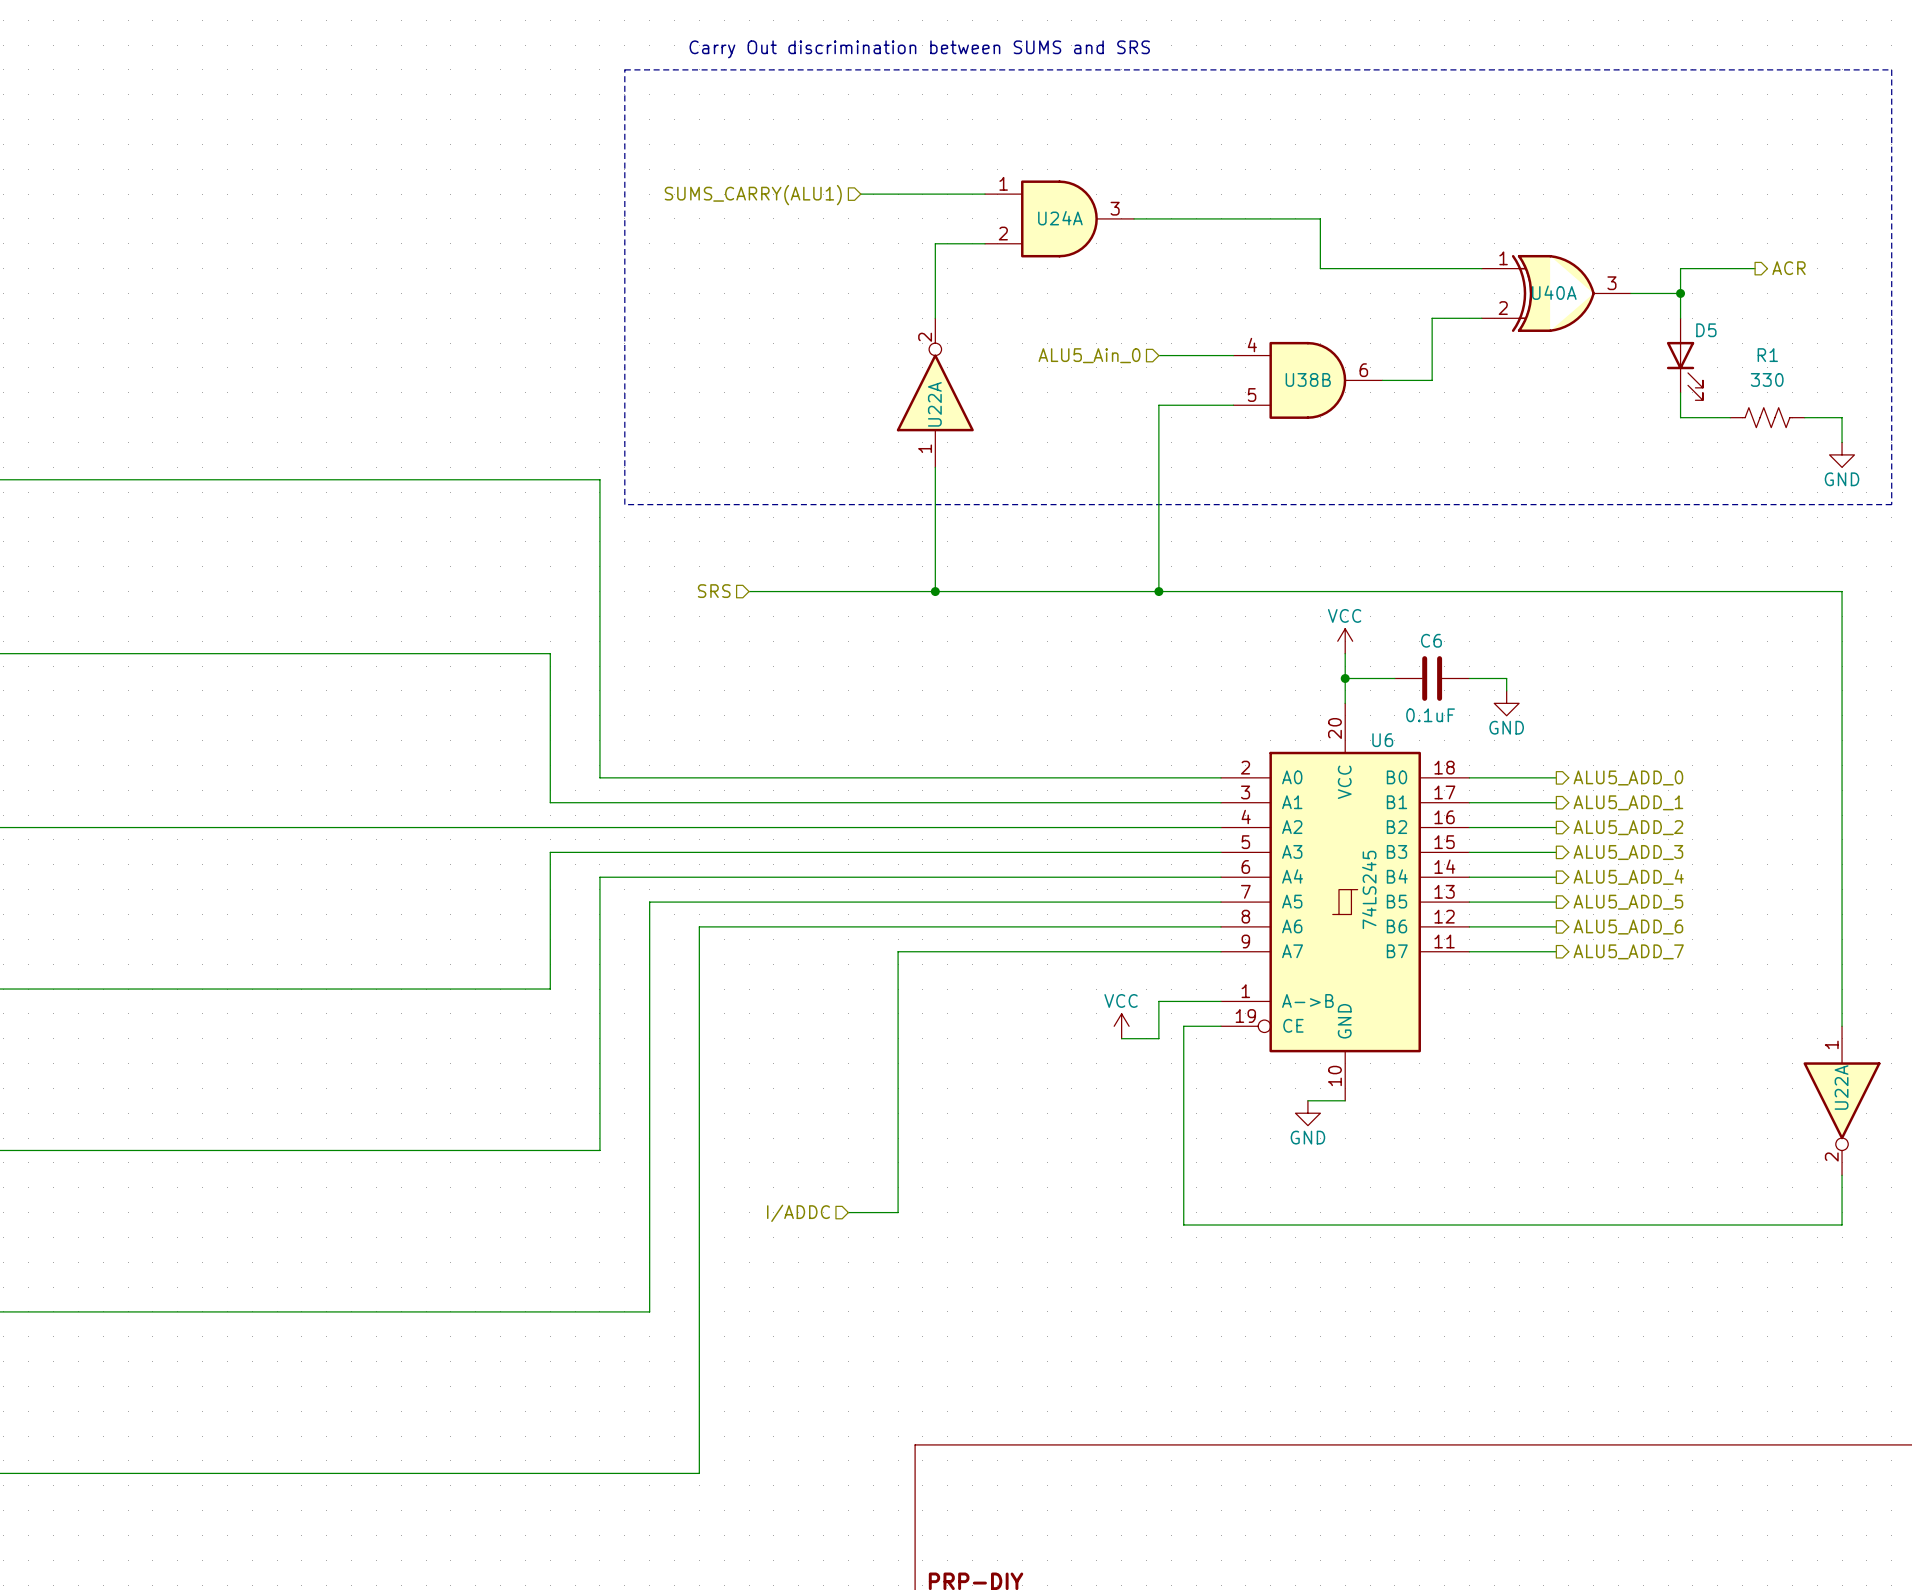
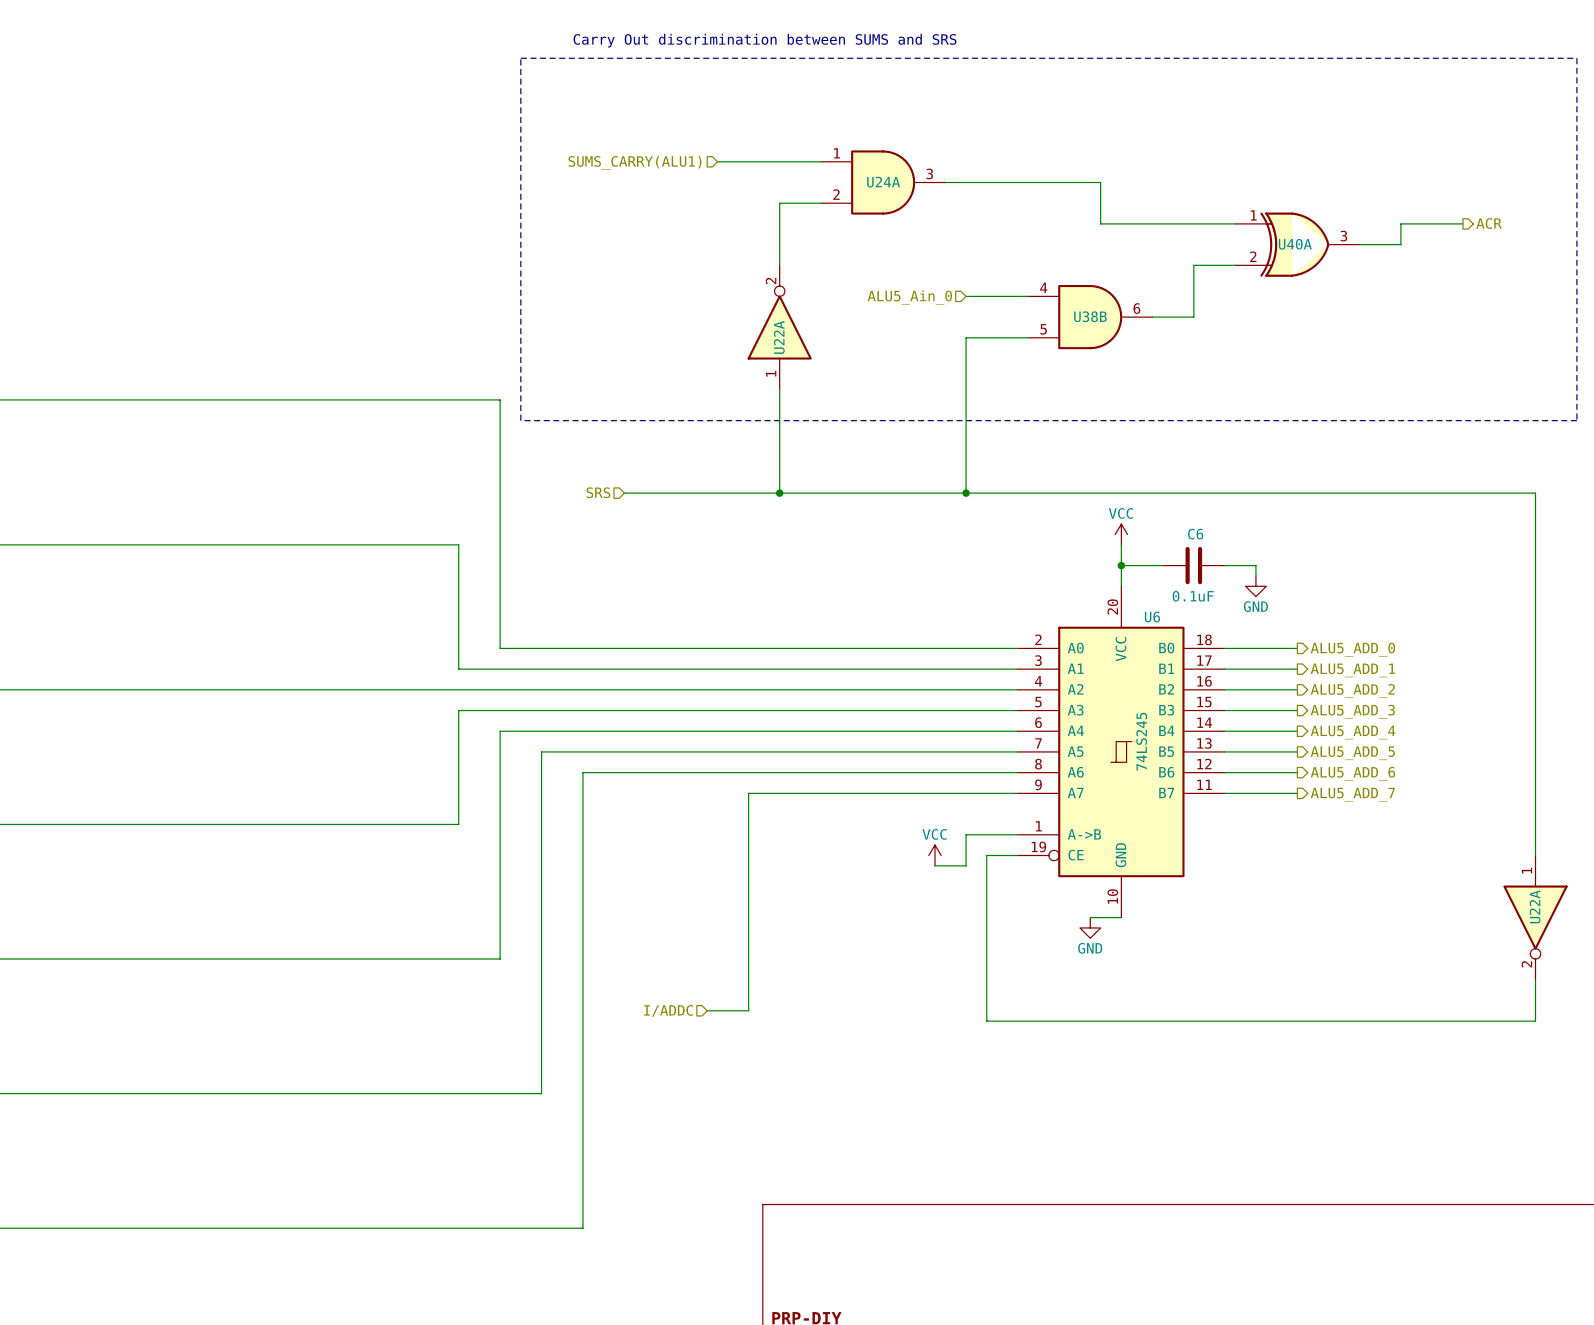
wire: (1680, 293) (1680, 318) -> none
junction: (1680, 293) -> none
D5: (1684, 359) -> none
wire: (1680, 392) (1680, 417) (1730, 417) -> none
R1: 330 (1767, 417) -> none
wire: (1804, 417) (1842, 417) (1842, 442) -> none
power symbol: GND (1842, 454) -> none

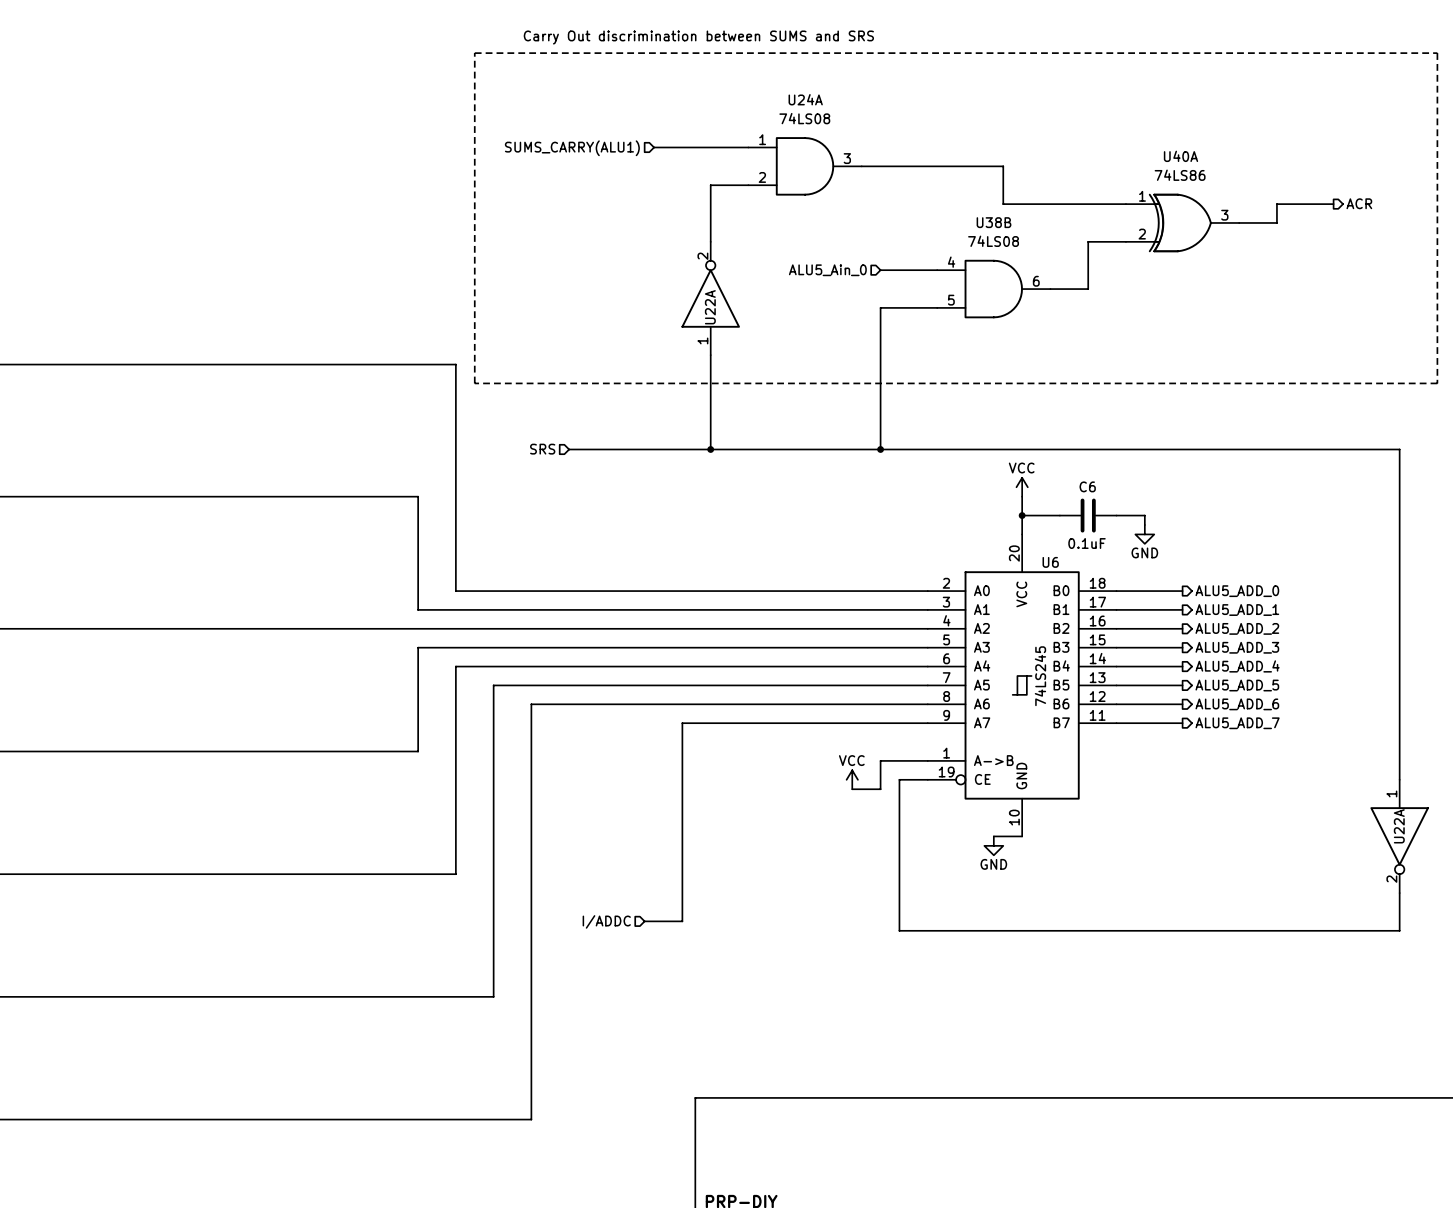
U24A value: none -> 74LS08 (804, 118)
U24A name position: U24A (883, 182) -> U24A (805, 99)
U40A value: none -> 74LS86 (1180, 175)
U40A name position: U40A (1295, 244) -> U40A (1180, 156)
U38B value: none -> 74LS08 (993, 241)
U38B name position: U38B (1090, 316) -> U38B (993, 222)

